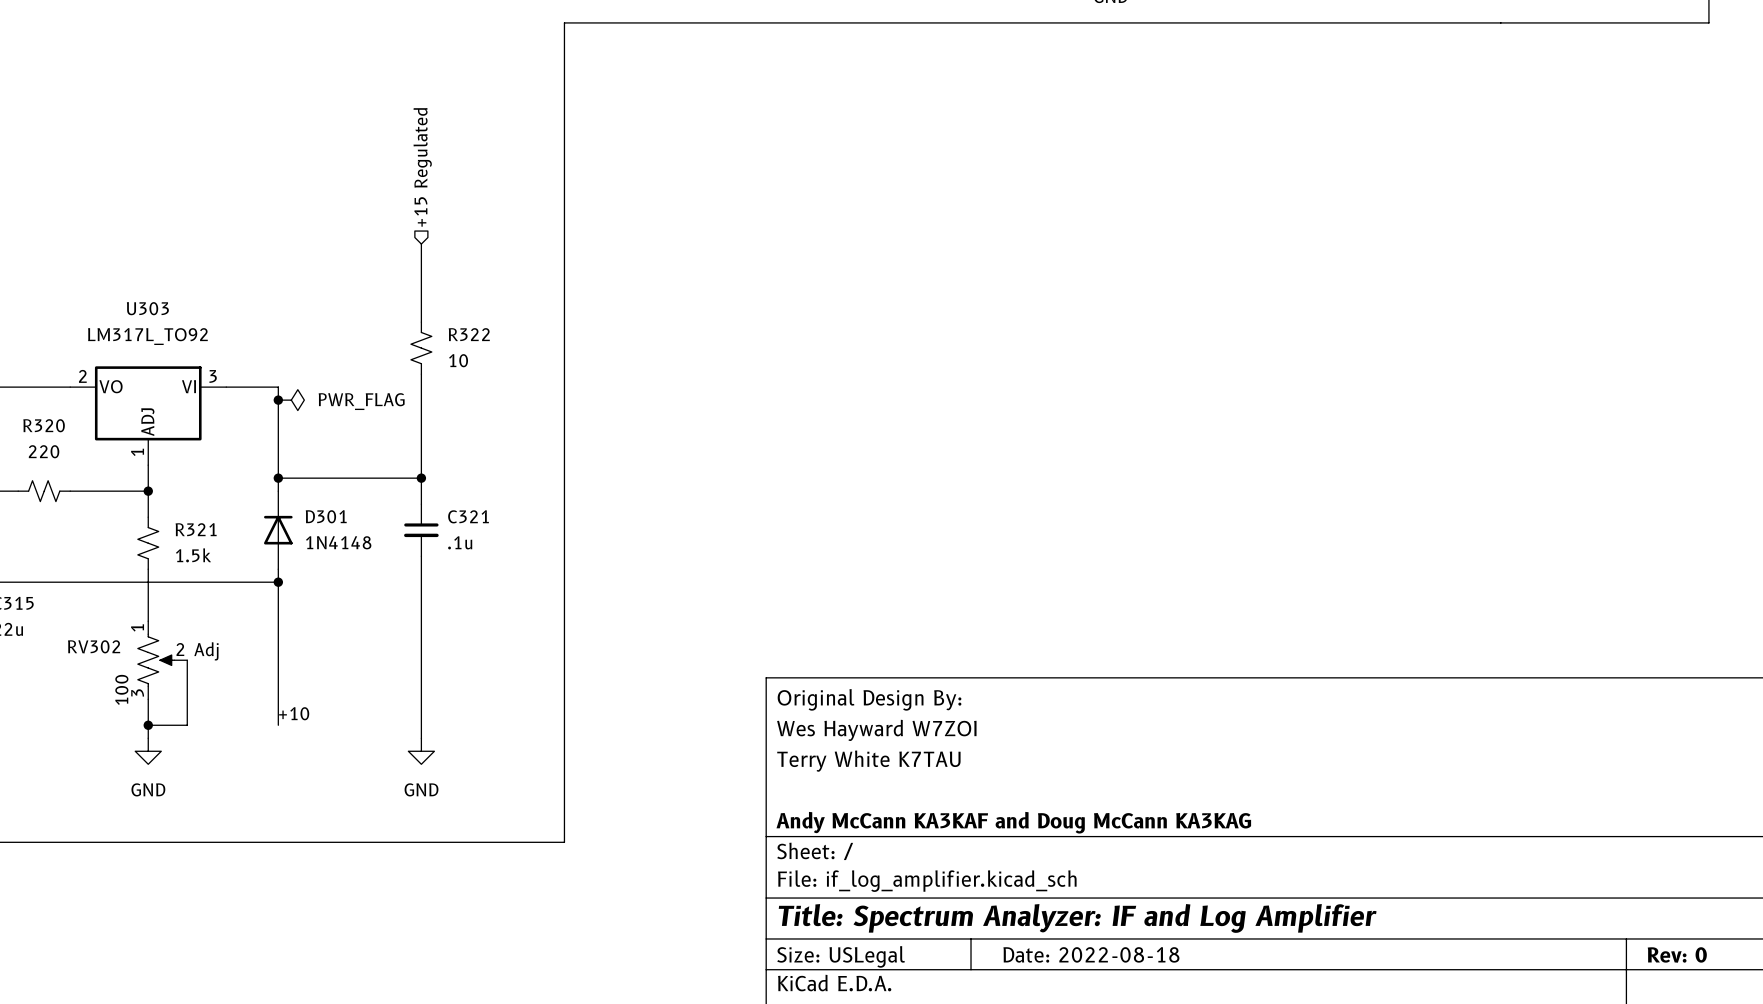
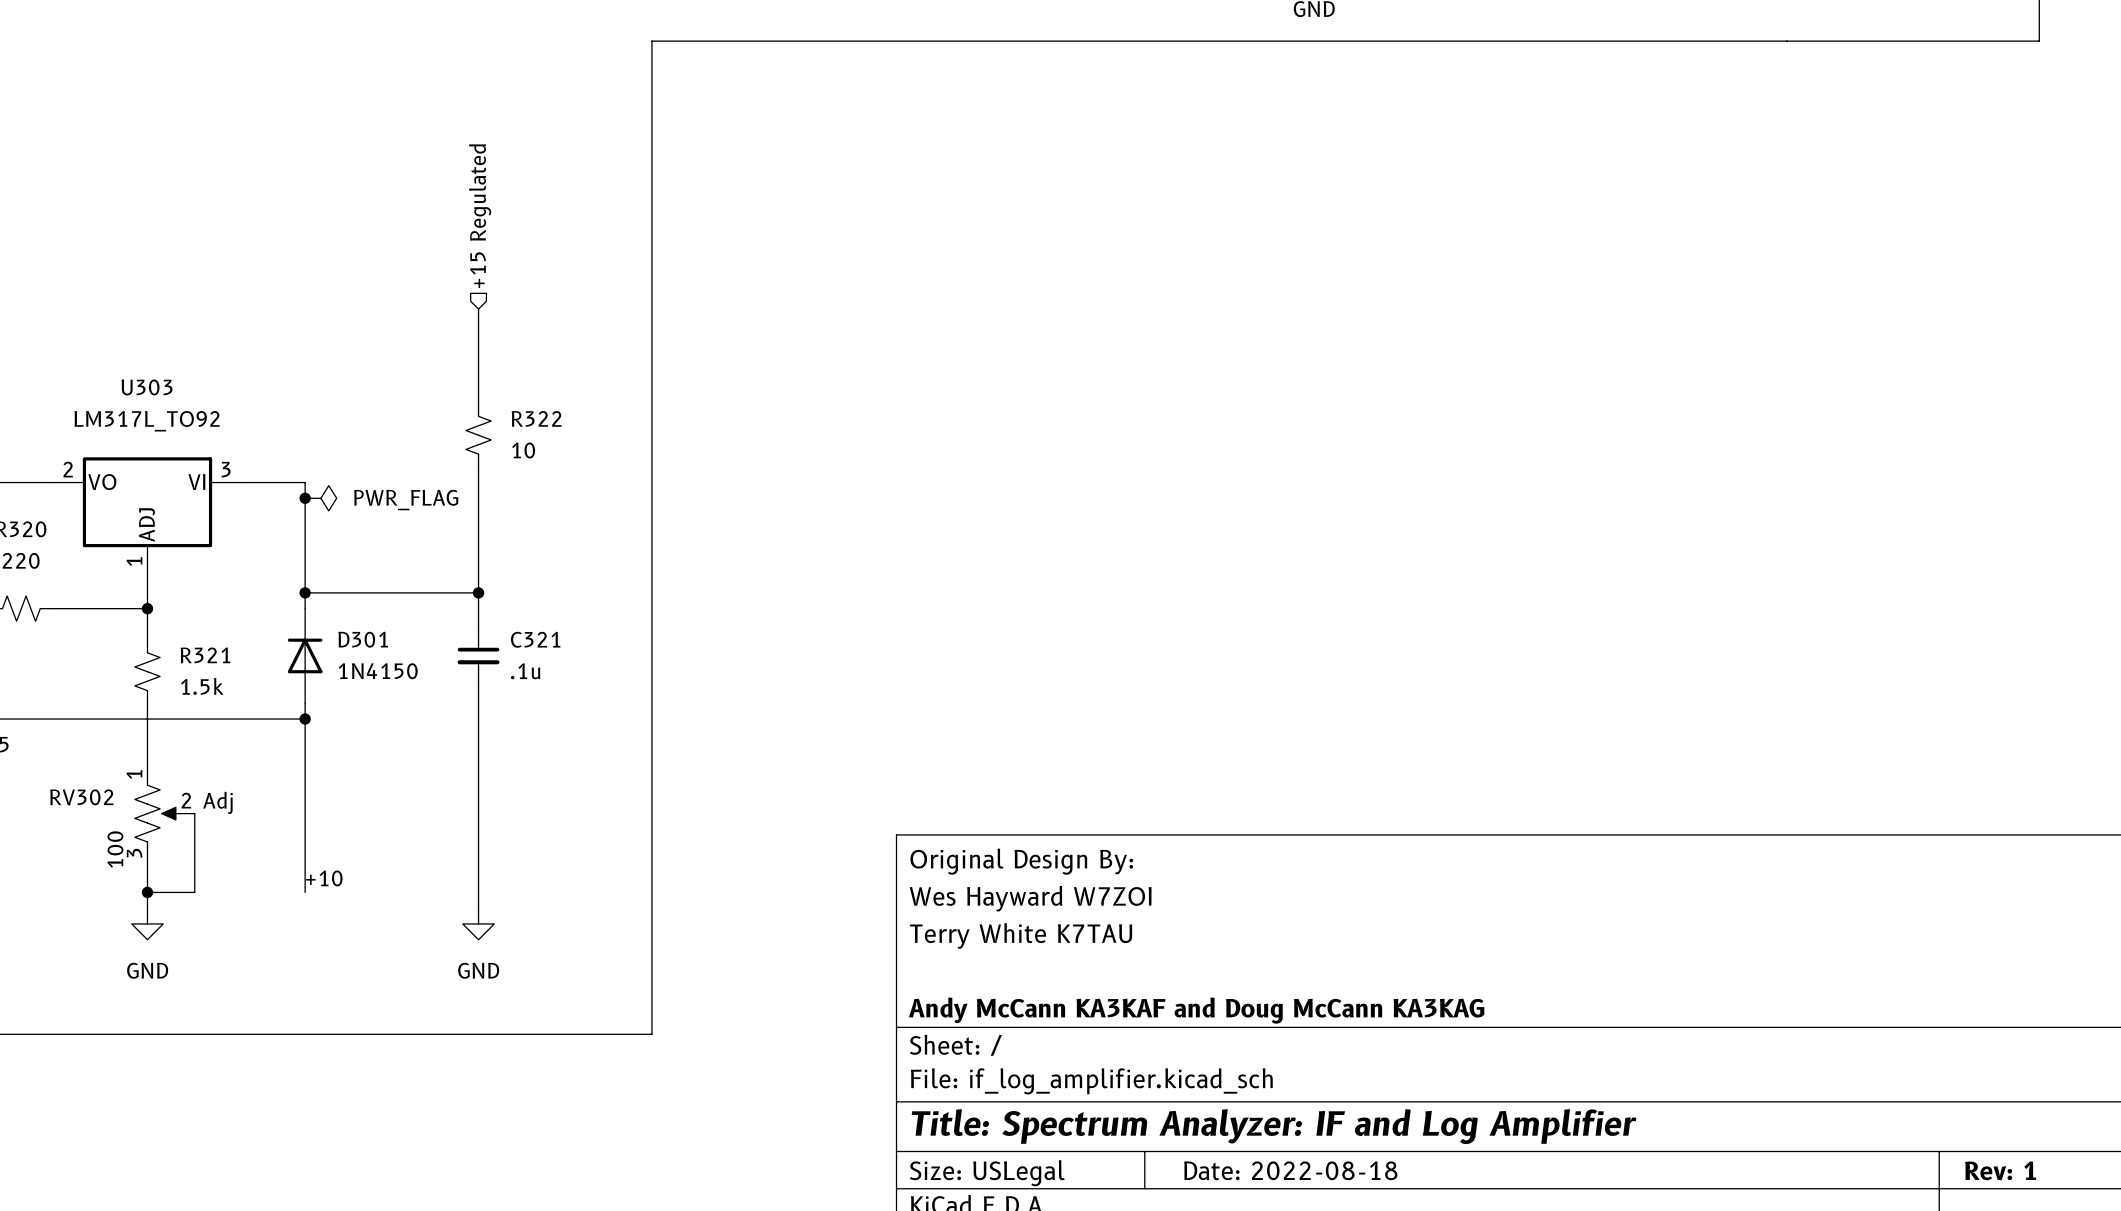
D301 value: 1N4148 (338, 542) -> 1N4150 (378, 671)
title block: Rev: 0 (1677, 954) -> Rev: 1 (2000, 1170)

